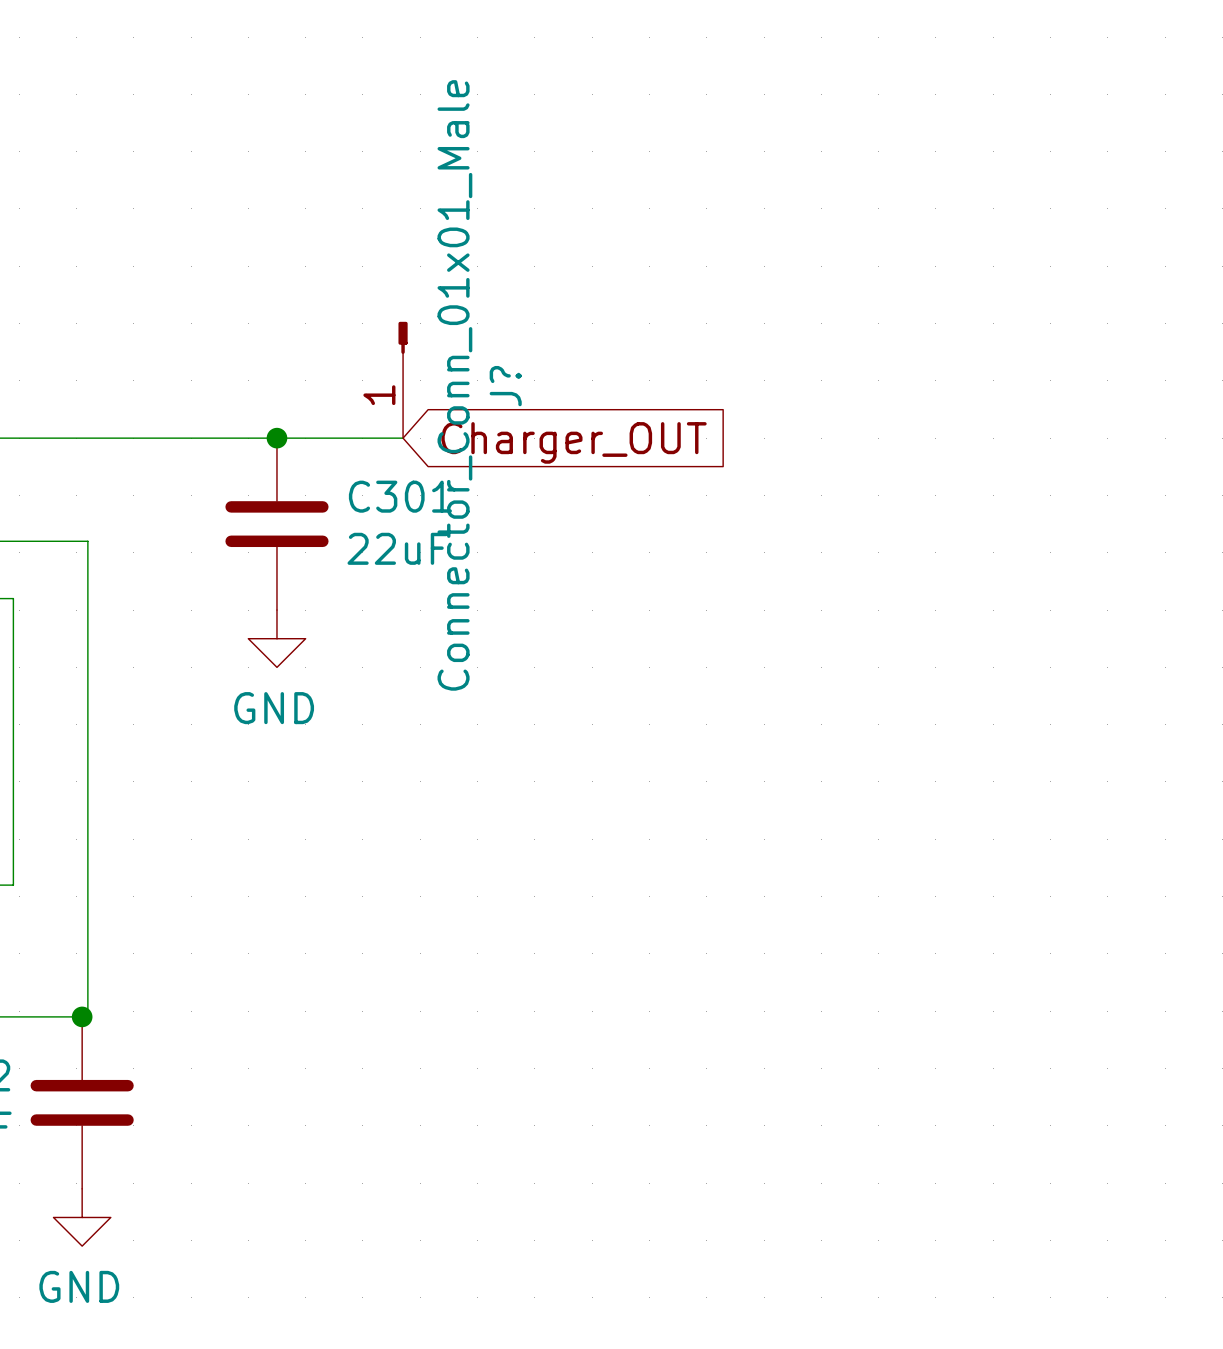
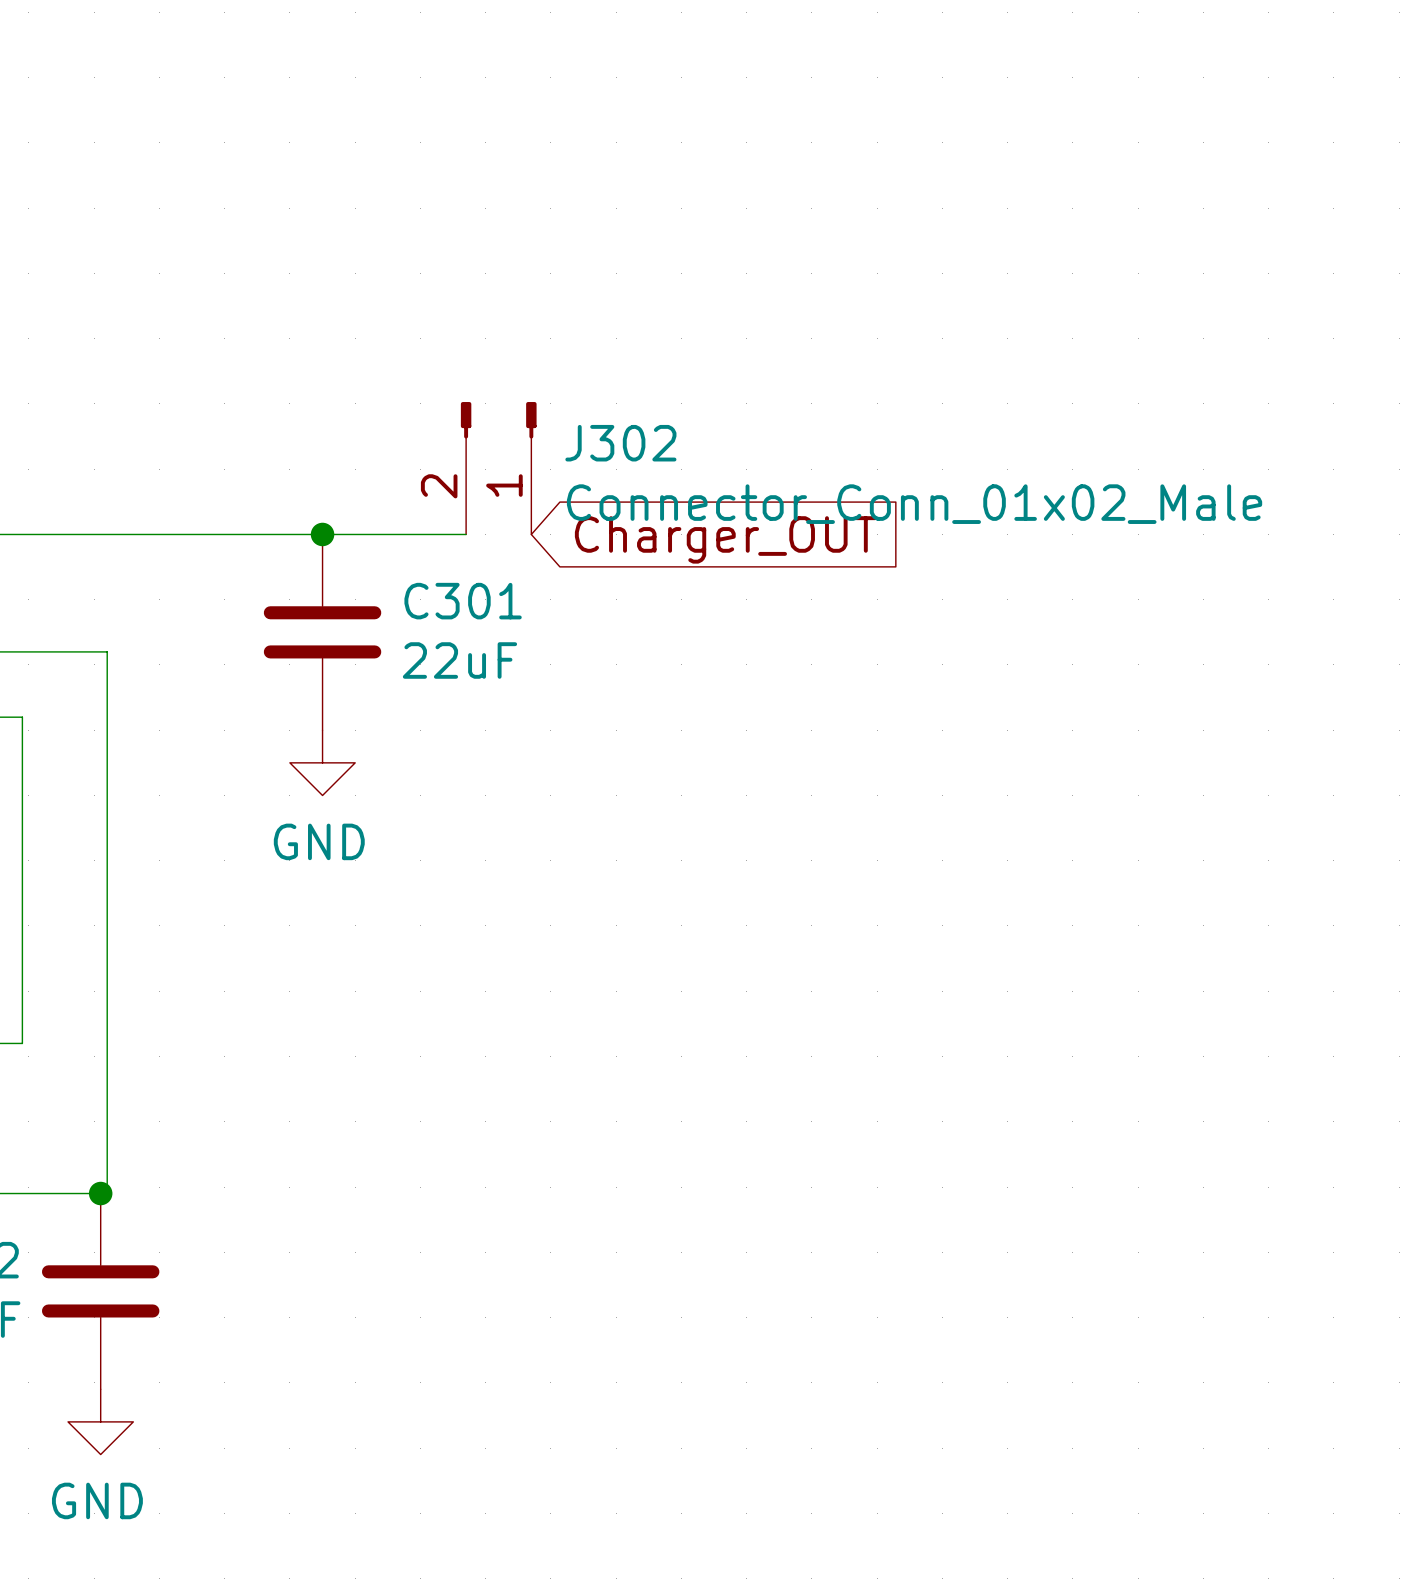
J?: Connector_Conn_01x01_Male (403, 379) -> none
J302: none -> Connector_Conn_01x02_Male (498, 468)
global label position: Charger_OUT (573, 442) -> Charger_OUT (725, 539)

